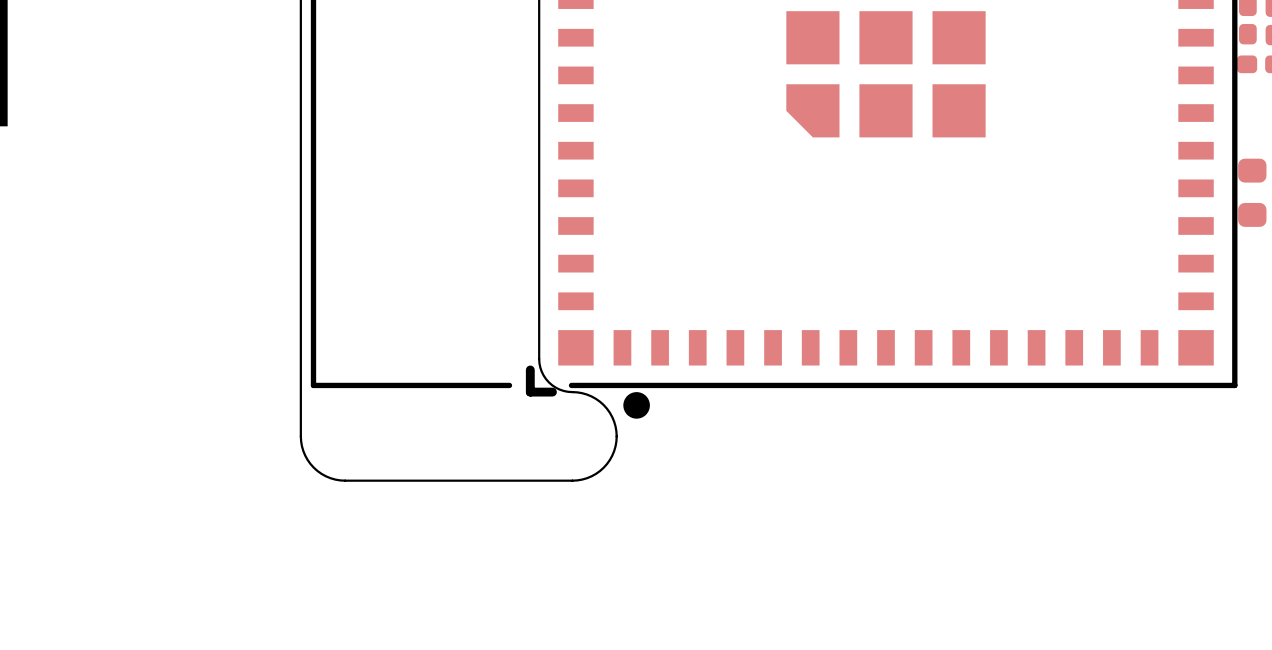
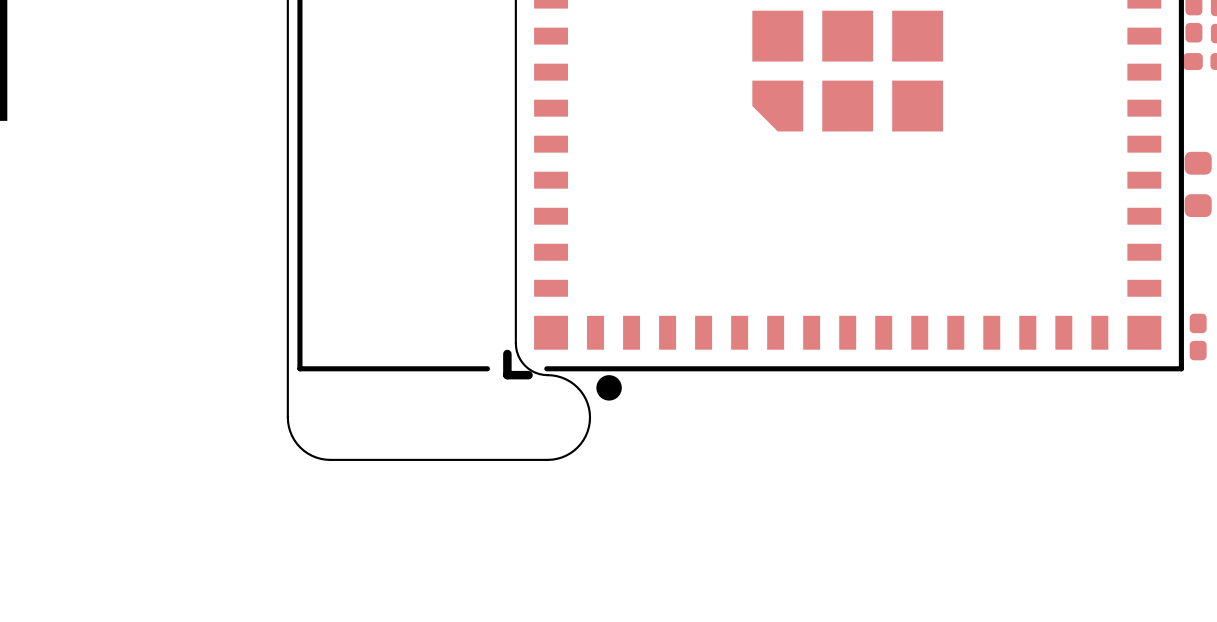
part: none -> (1198, 337)

